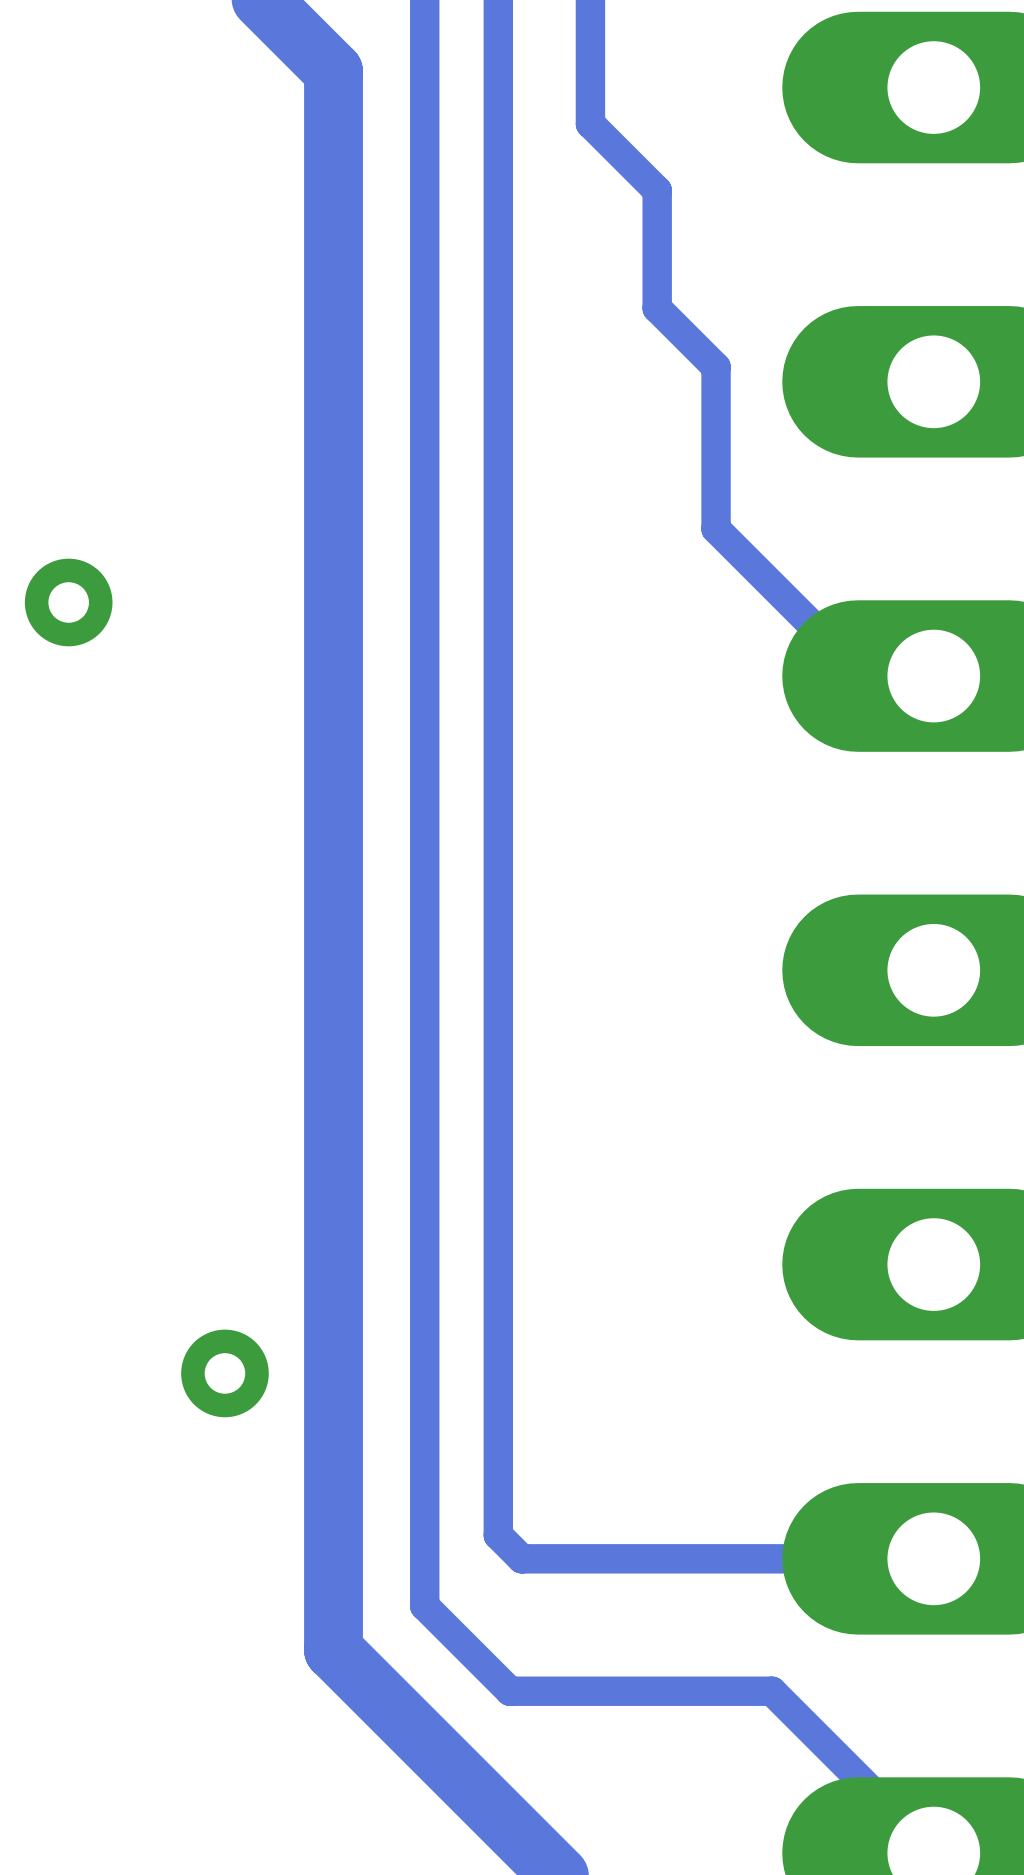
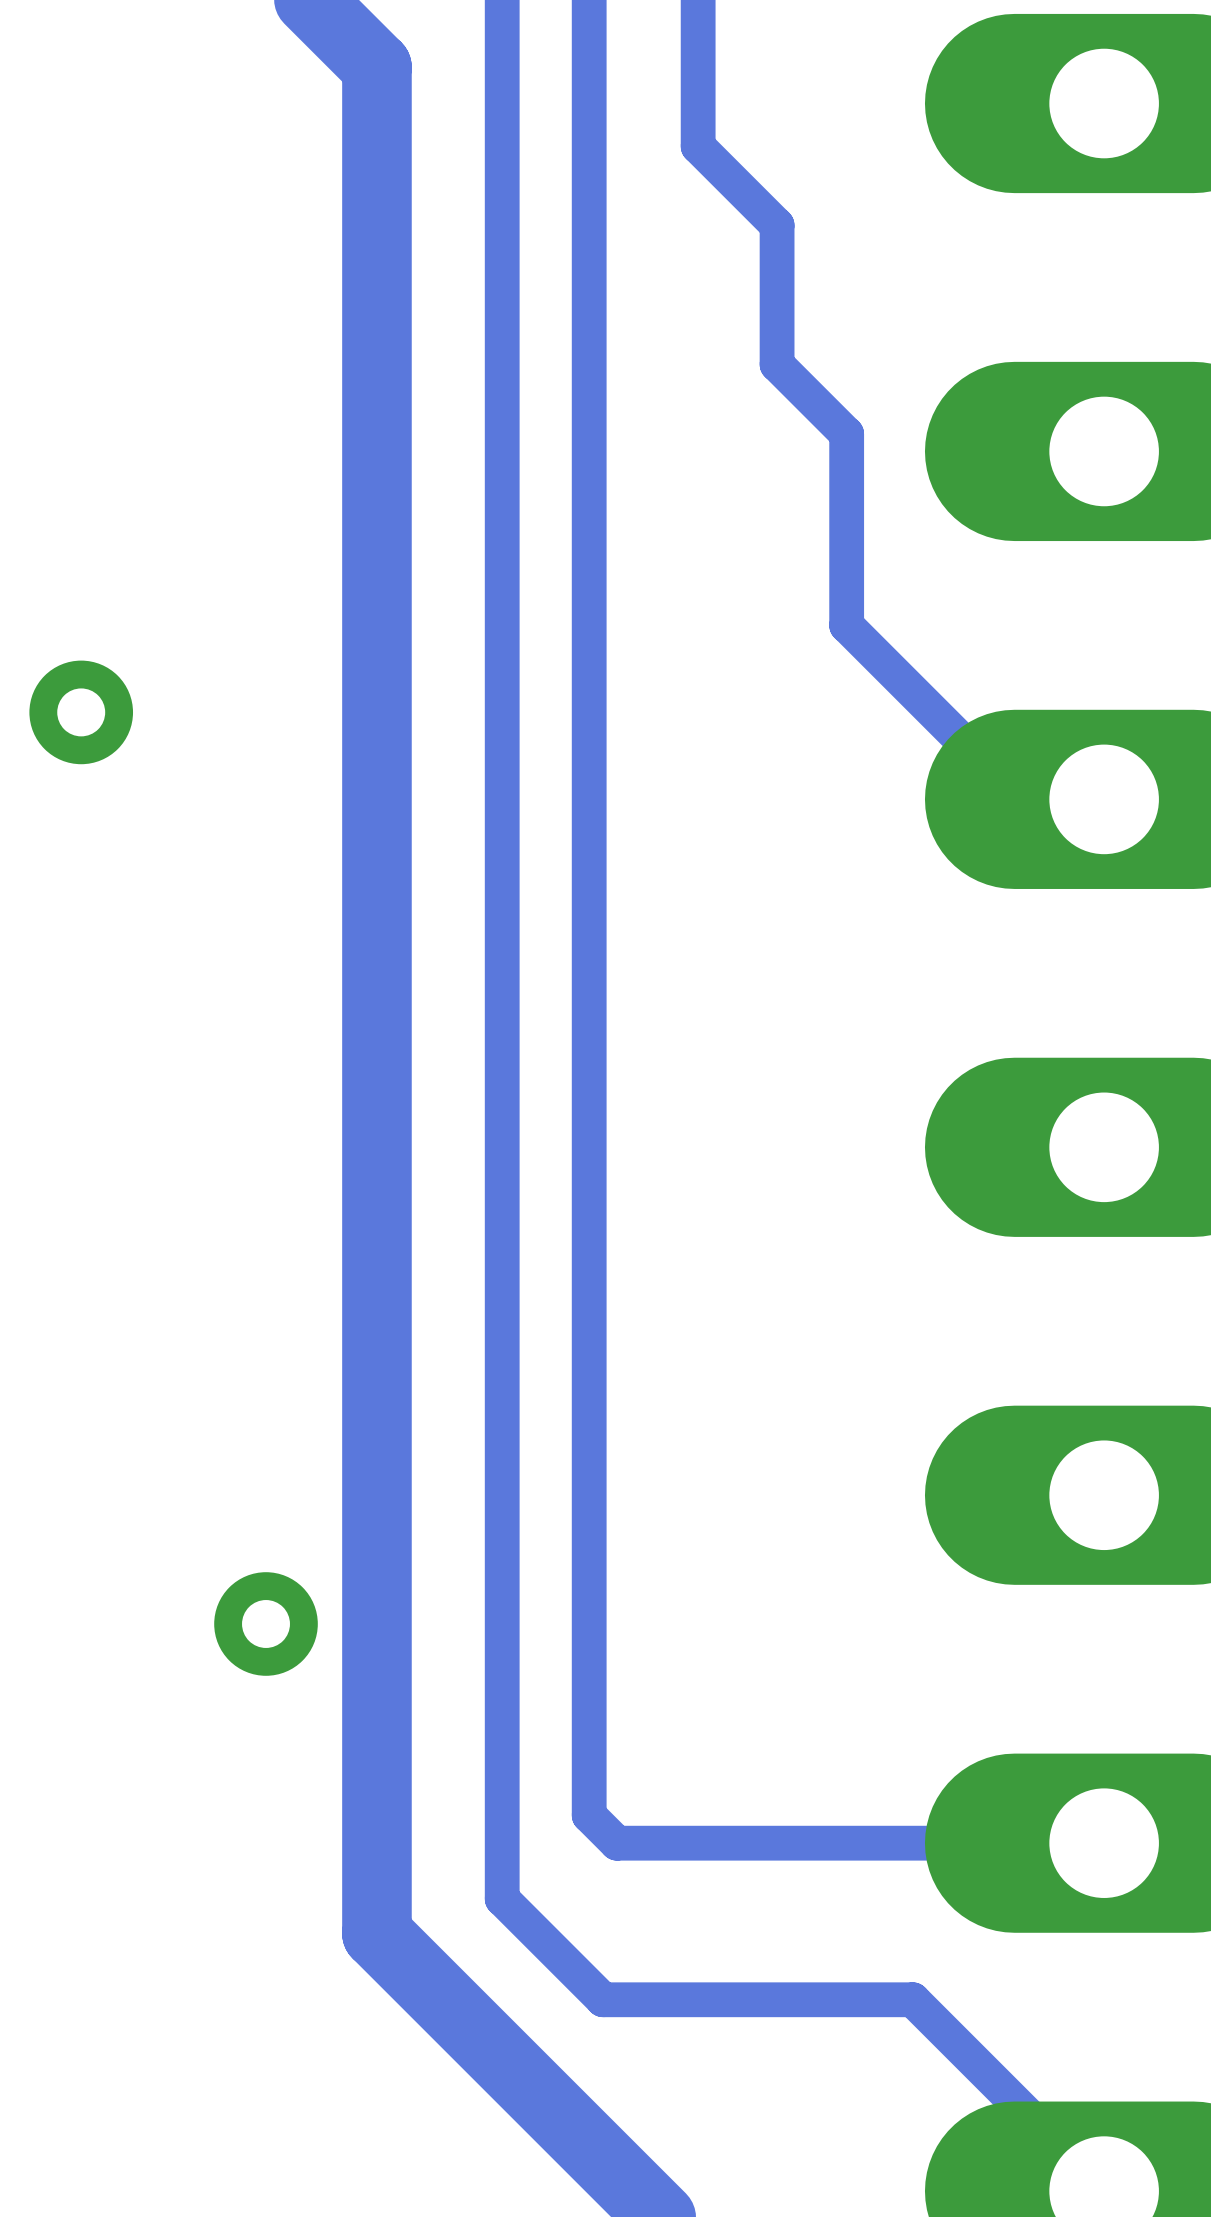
track: (318, 56) (333, 71) (333, 1650) -> (376, 67) (376, 1933) (394, 1951)

